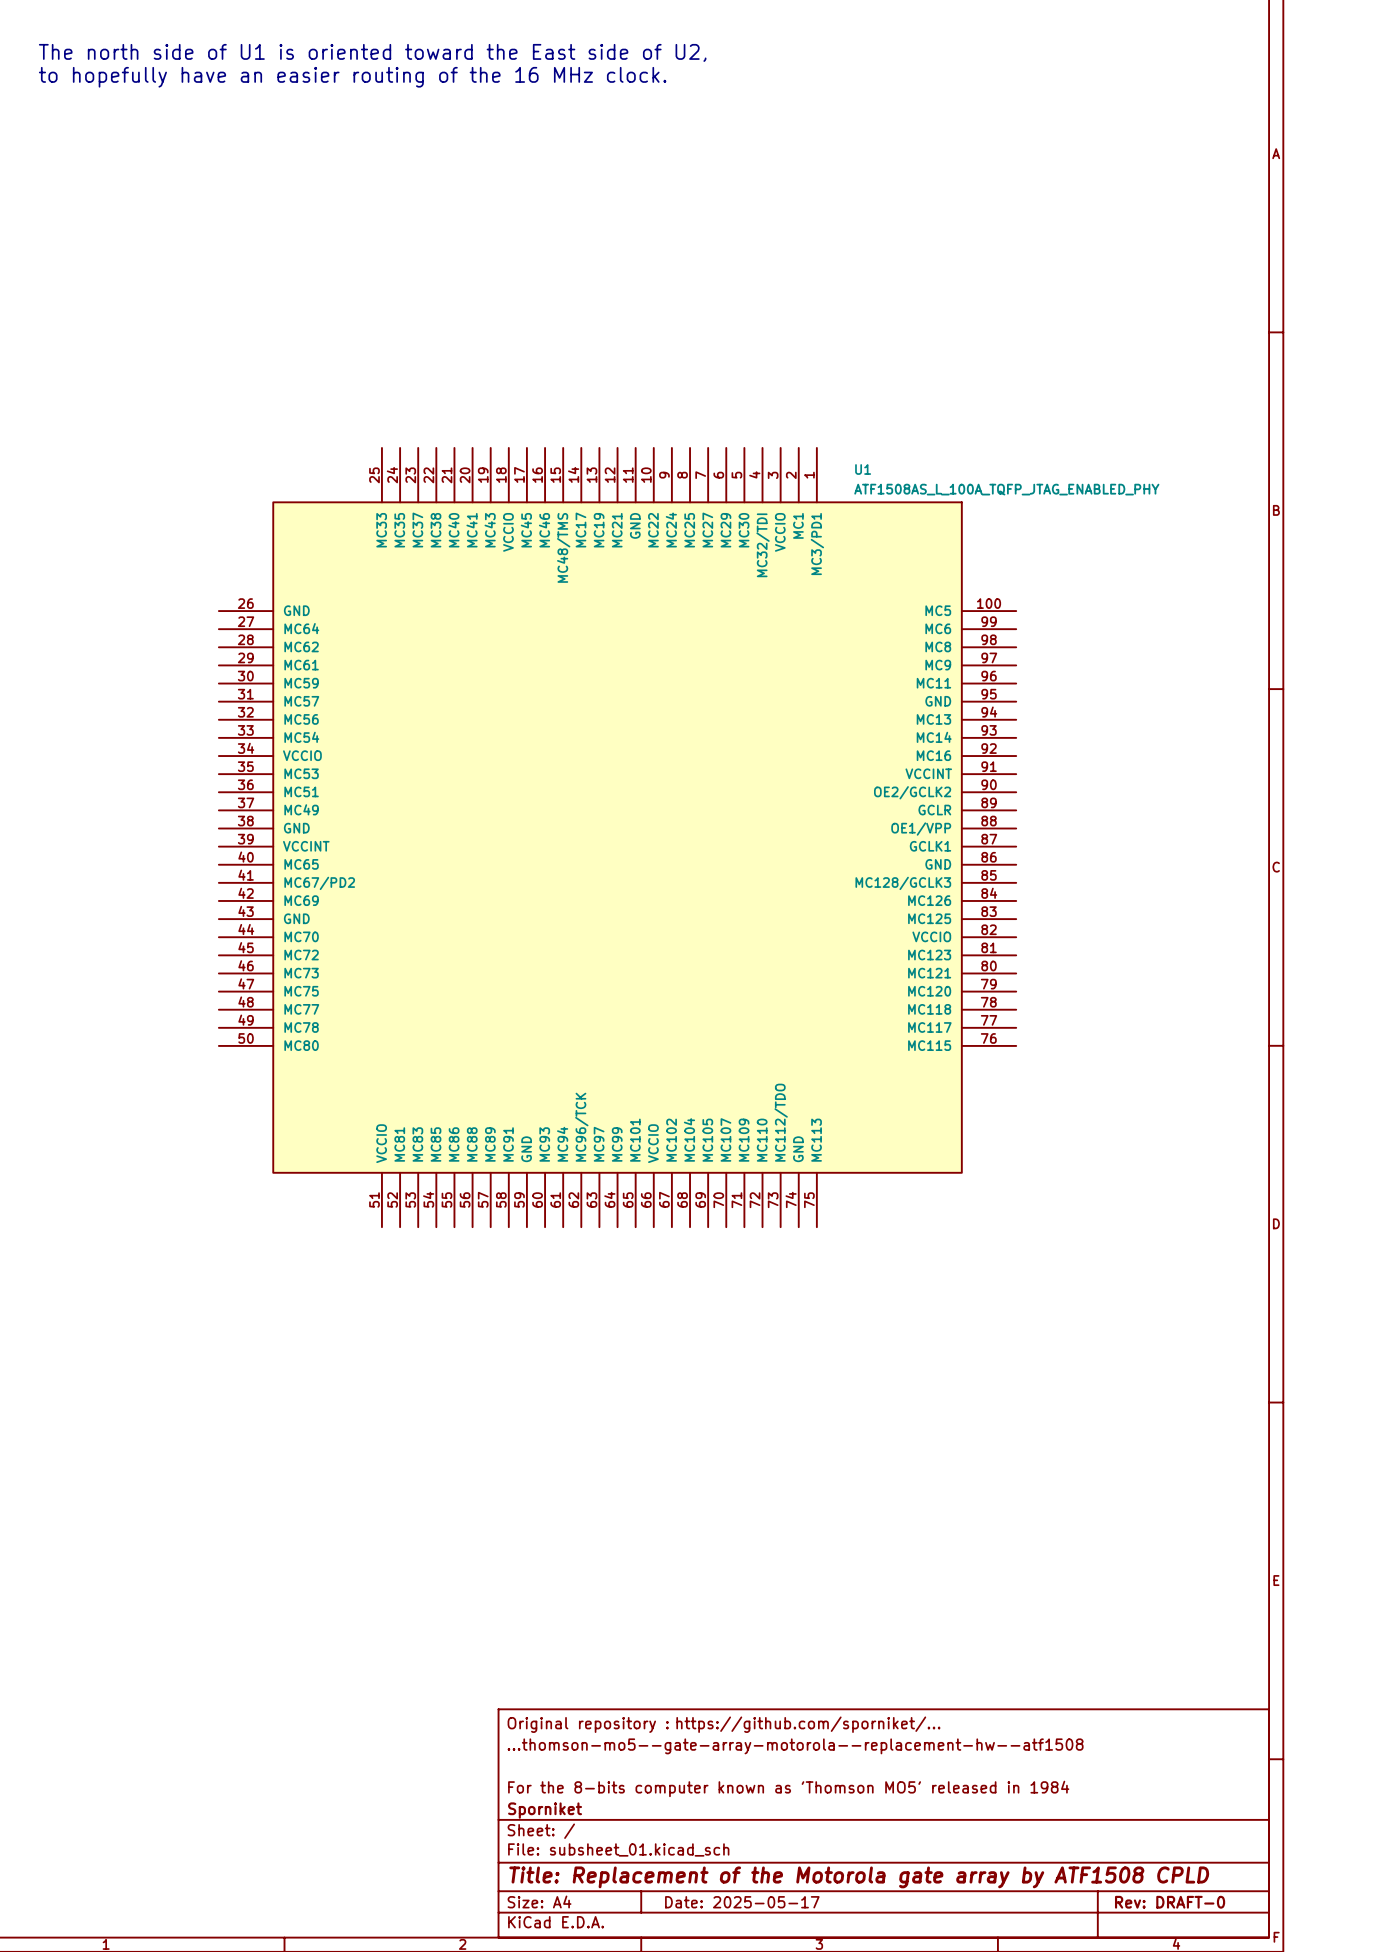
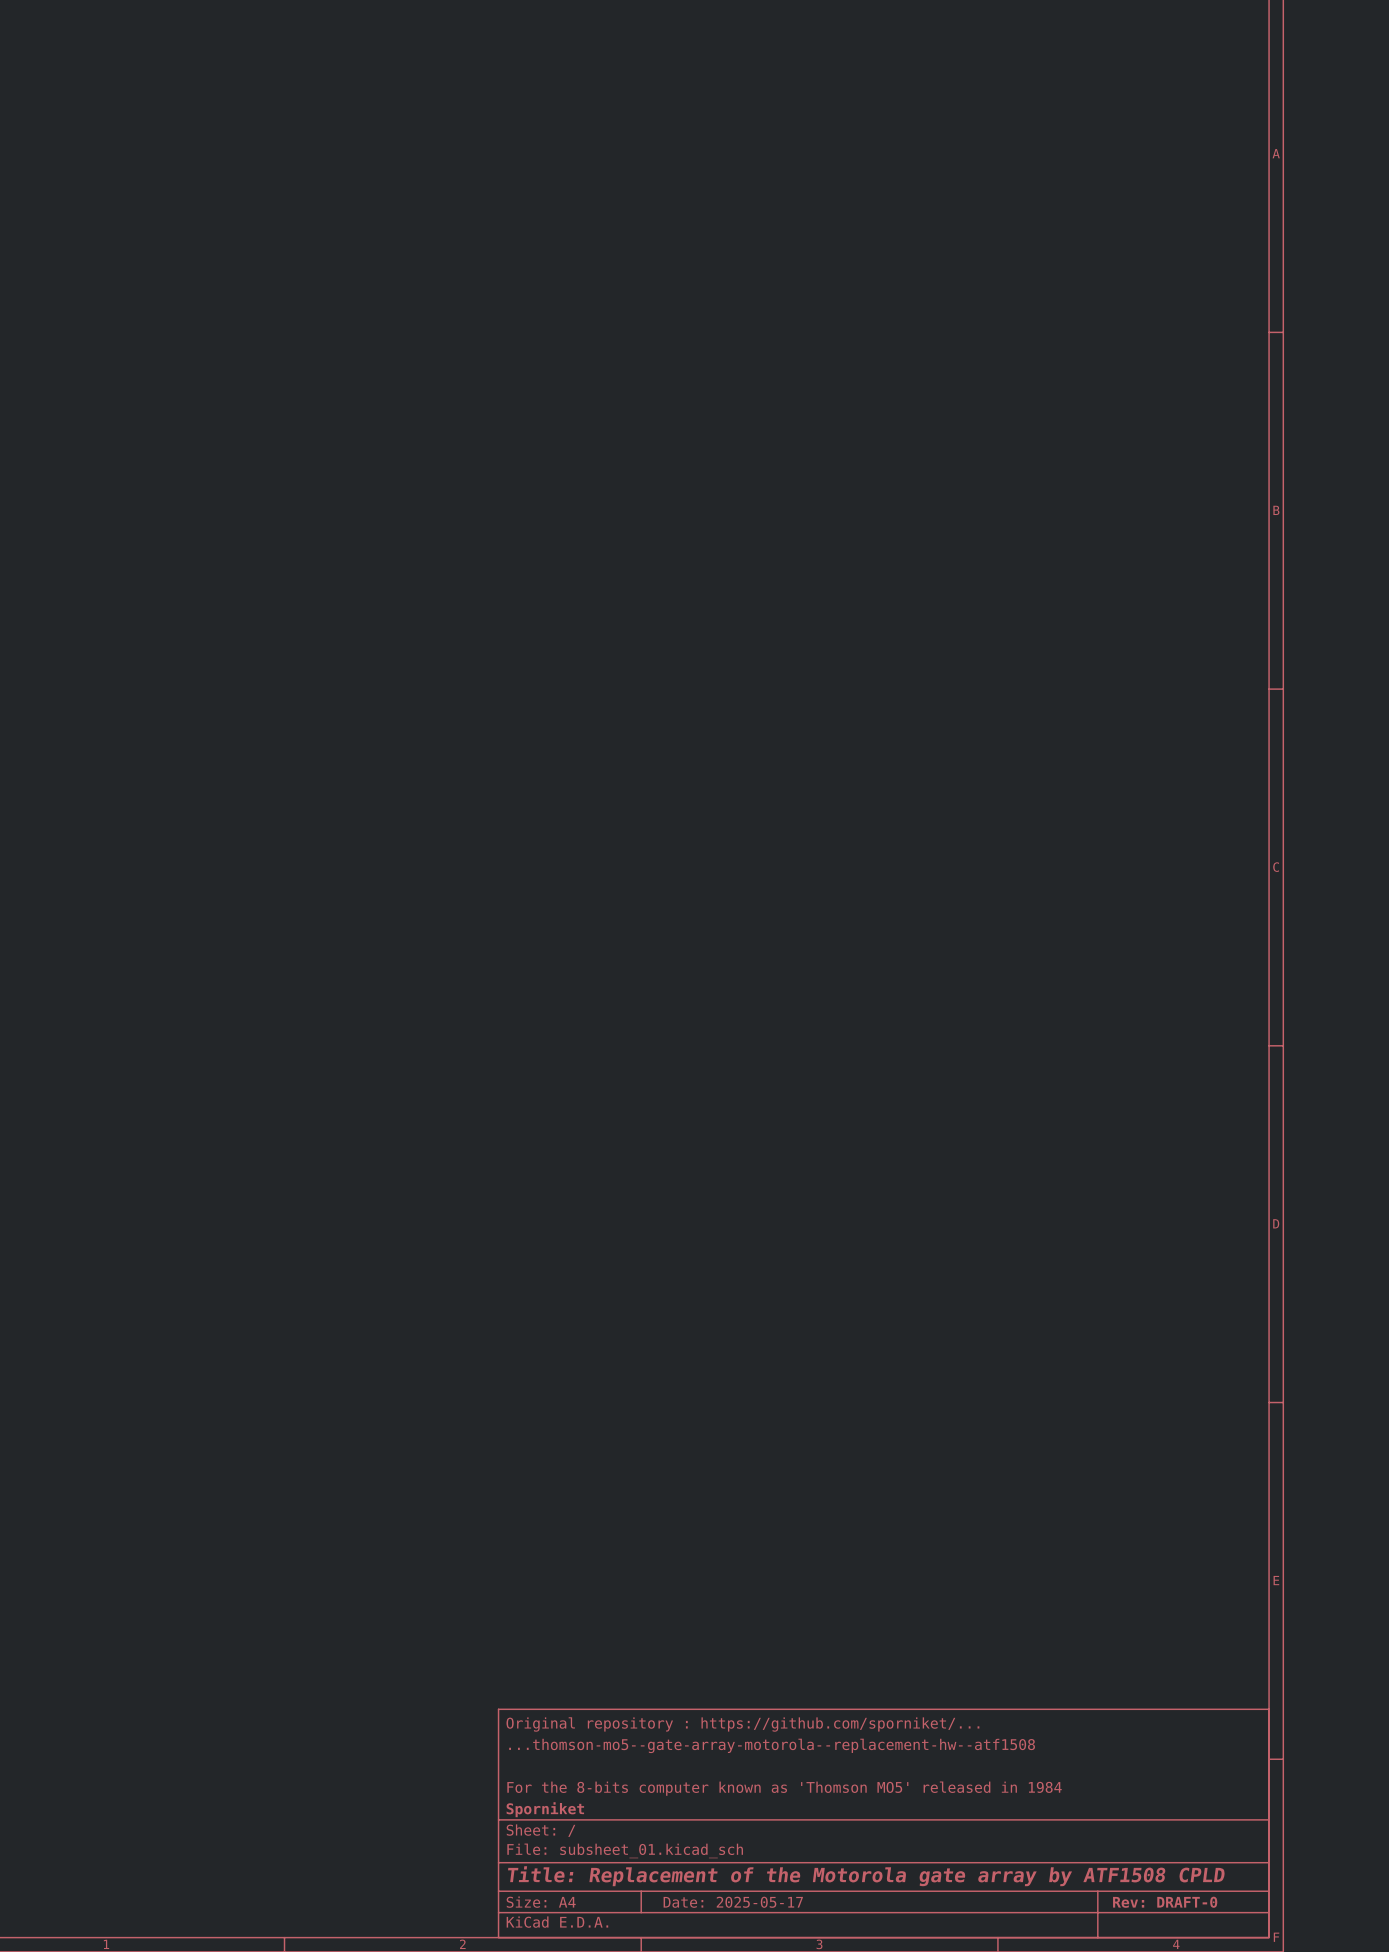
text: The north side of U1 is oriented toward the East side of U2, (372, 52) -> none
text: to hopefully have an easier routing of the 16 MHz clock. (352, 77) -> none
U1: ATF1508AS_L_100A_TQFP_JTAG_ENABLED_PHY (617, 837) -> none

